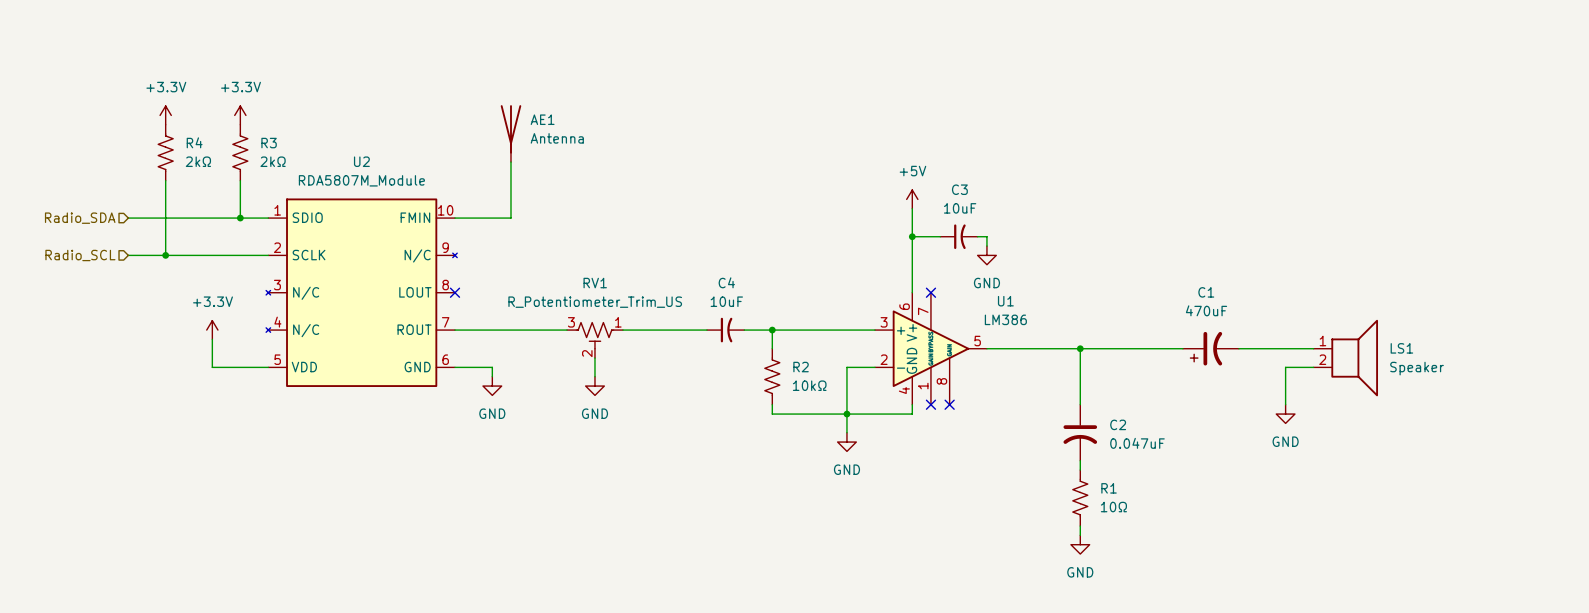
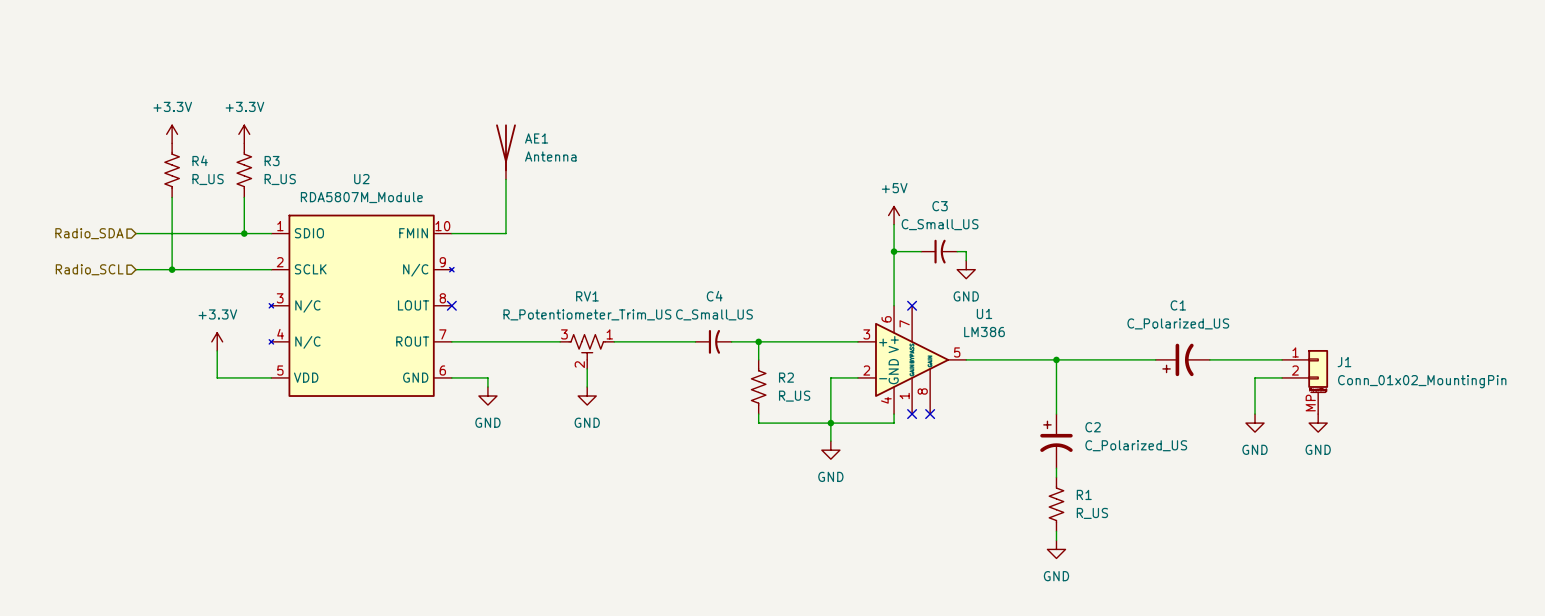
R4 value: 2kΩ (198, 161) -> R_US (208, 179)
R3 value: 2kΩ (273, 161) -> R_US (280, 179)
C3 value: 10uF (960, 208) -> C_Small_US (940, 224)
C4 value: 10uF (726, 301) -> C_Small_US (714, 314)
C1 value: 470uF (1206, 310) -> C_Polarized_US (1178, 323)
LS1: Speaker (1345, 358) -> none
J1: none -> Conn_01x02_MountingPin (1305, 382)
R2 value: 10kΩ (809, 385) -> R_US (794, 396)
C2 symbol: [1063, 404, 1098, 461] -> [1040, 414, 1073, 469]
power symbol: none -> GND (1318, 423)
C2 value: 0.047uF (1137, 443) -> C_Polarized_US (1136, 445)
R1 value: 10Ω (1113, 507) -> R_US (1092, 513)

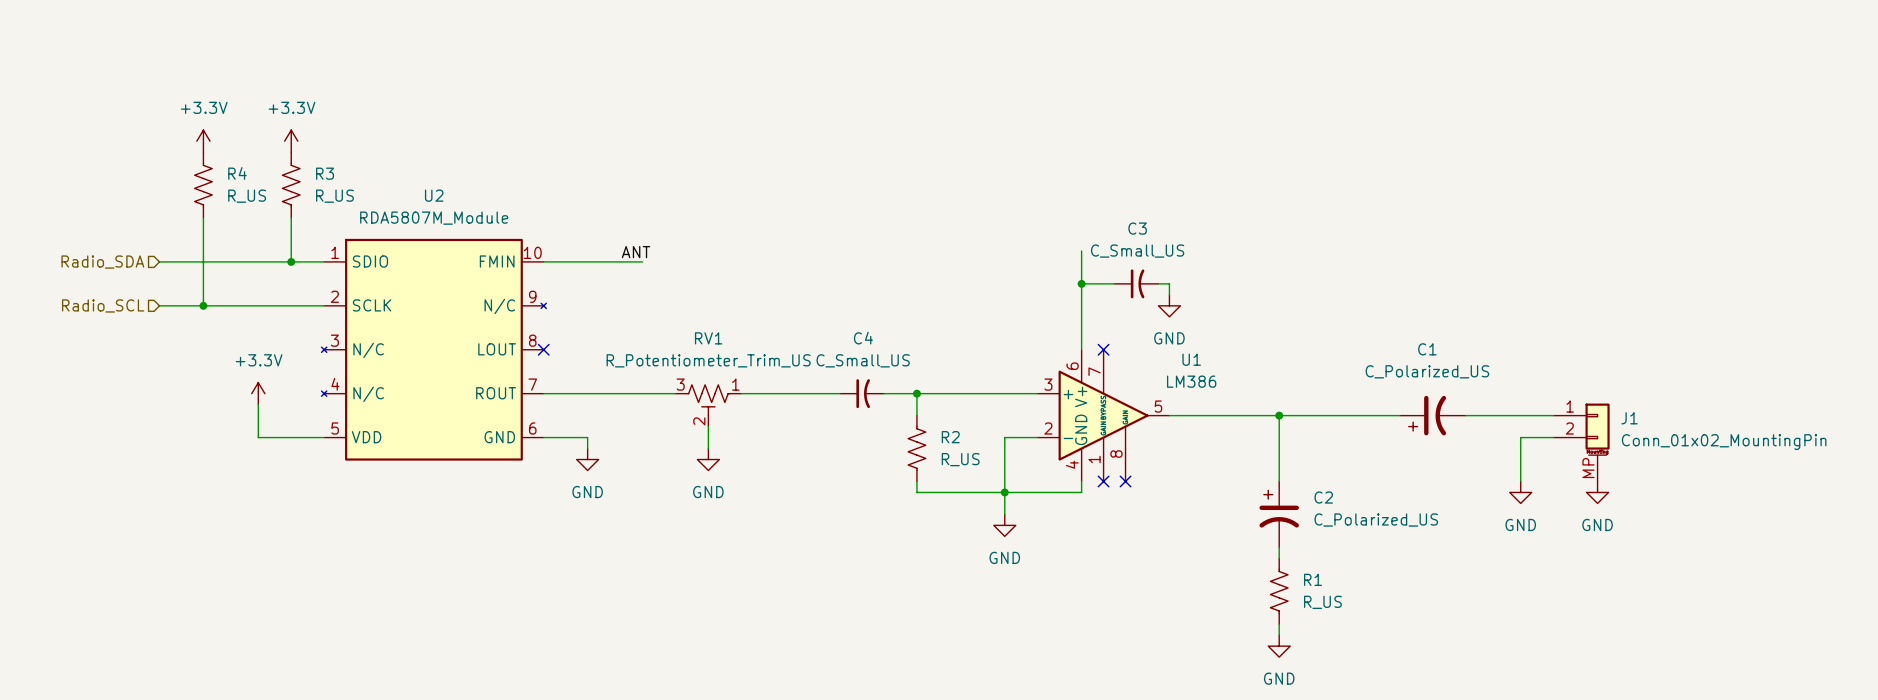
AE1: Antenna (506, 151) -> none
wire: (506, 179) (506, 233) -> (642, 261) (609, 261)
power symbol: +5V (894, 215) -> none
label: none -> ANT (636, 252)

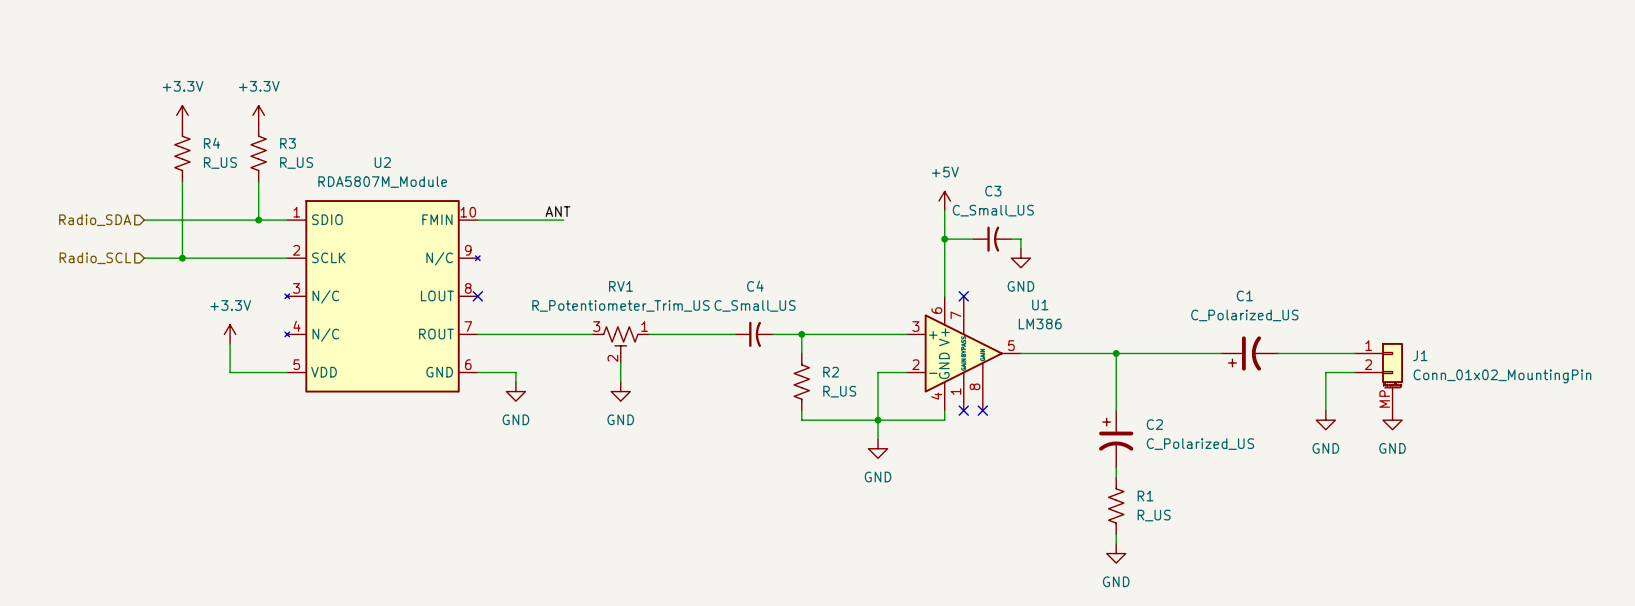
power symbol: none -> +5V (944, 201)

